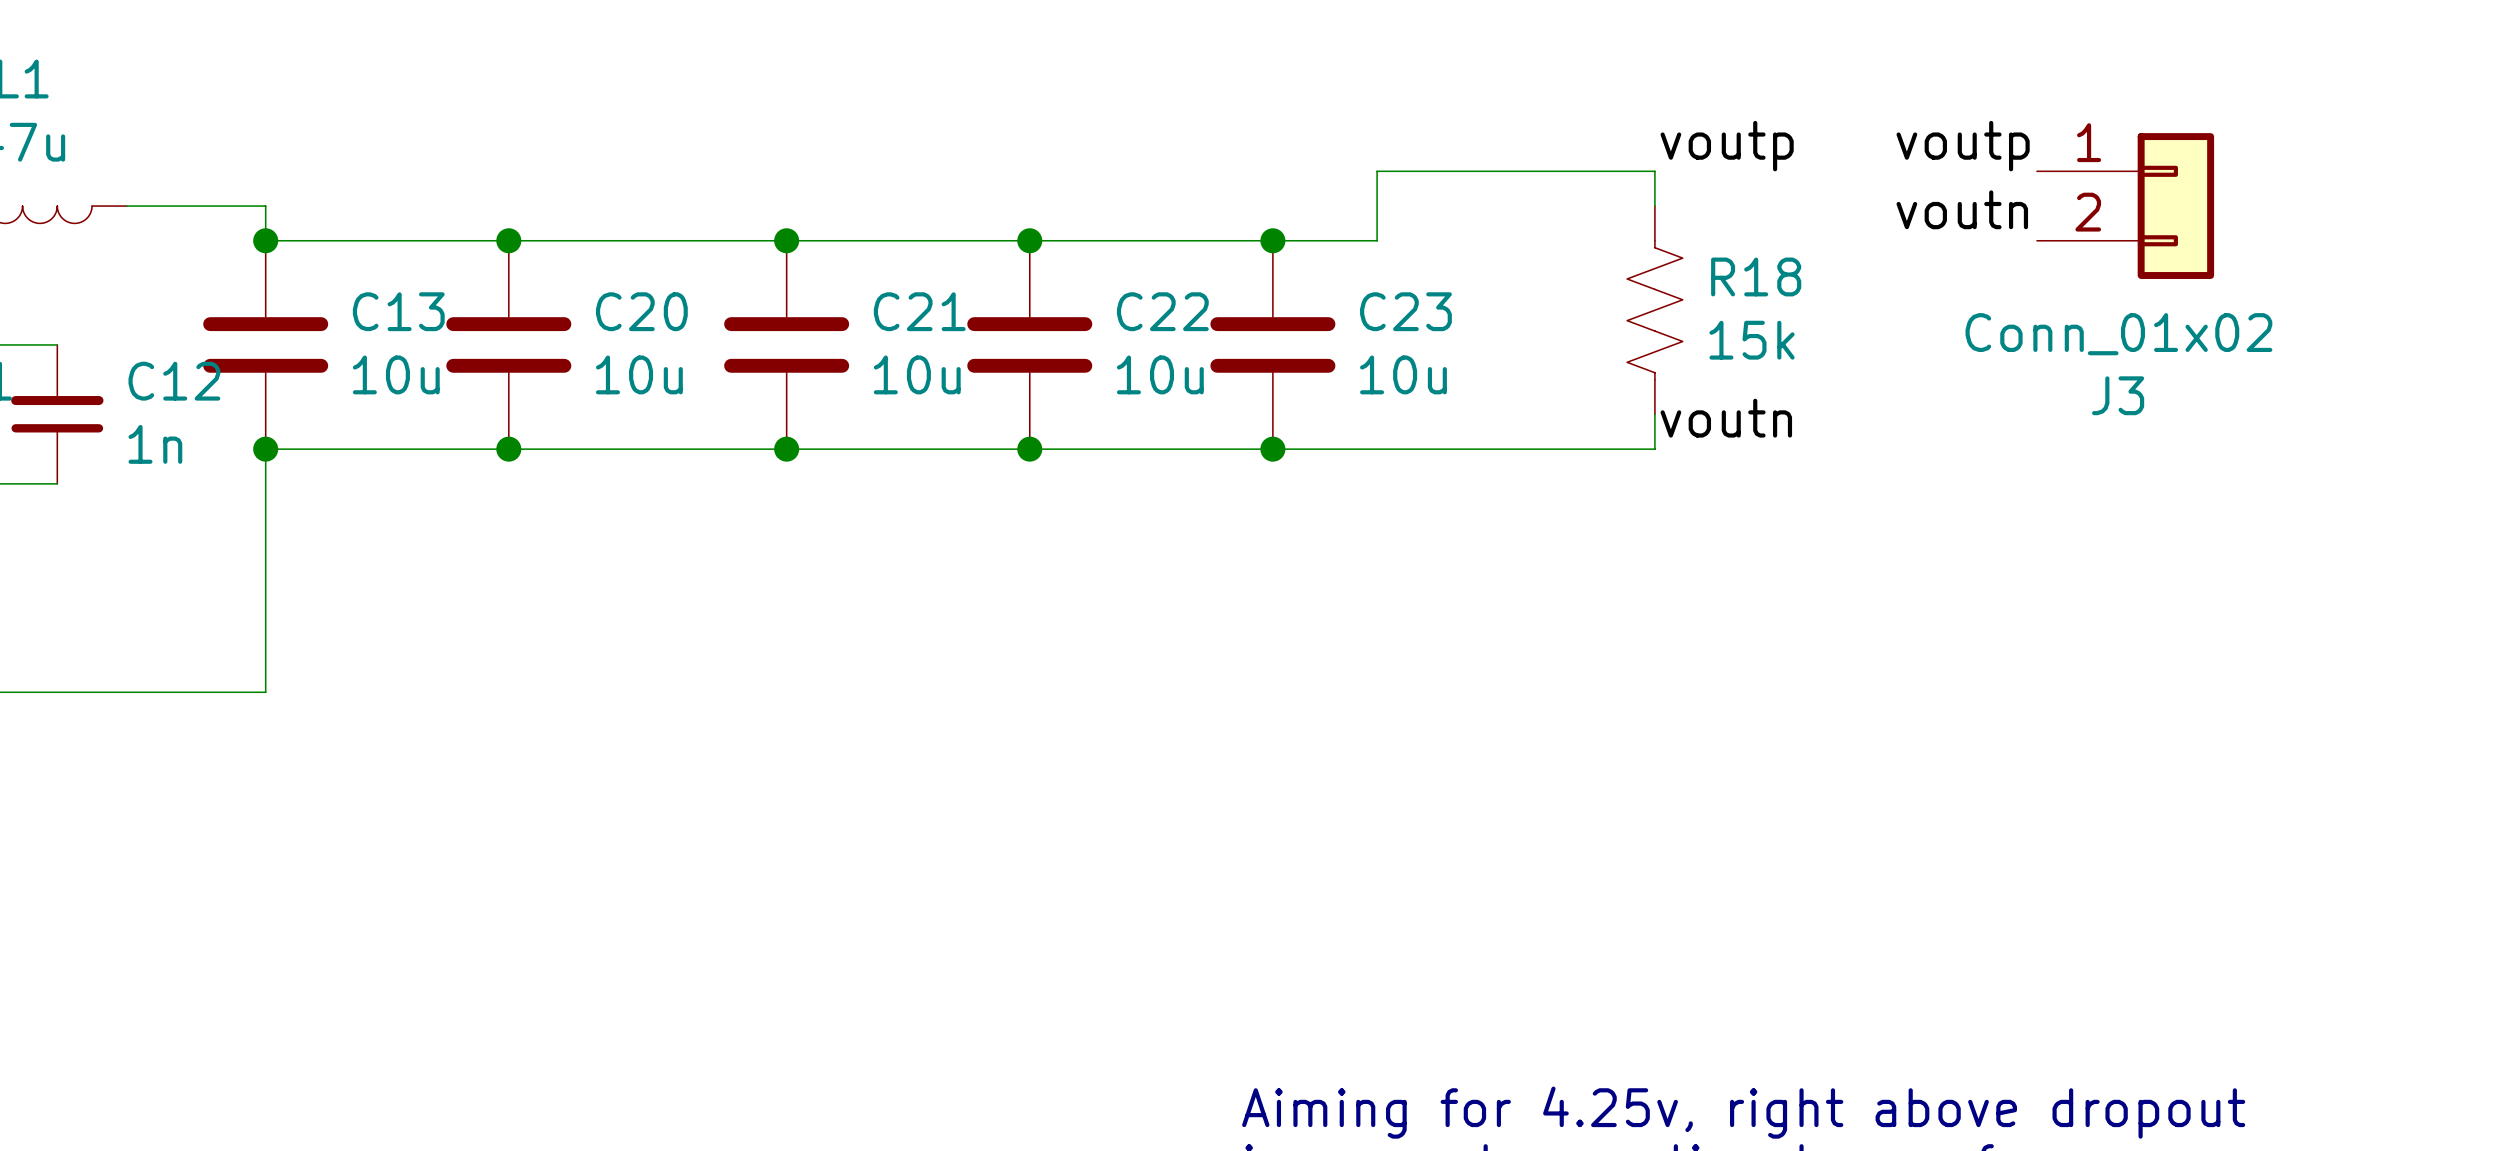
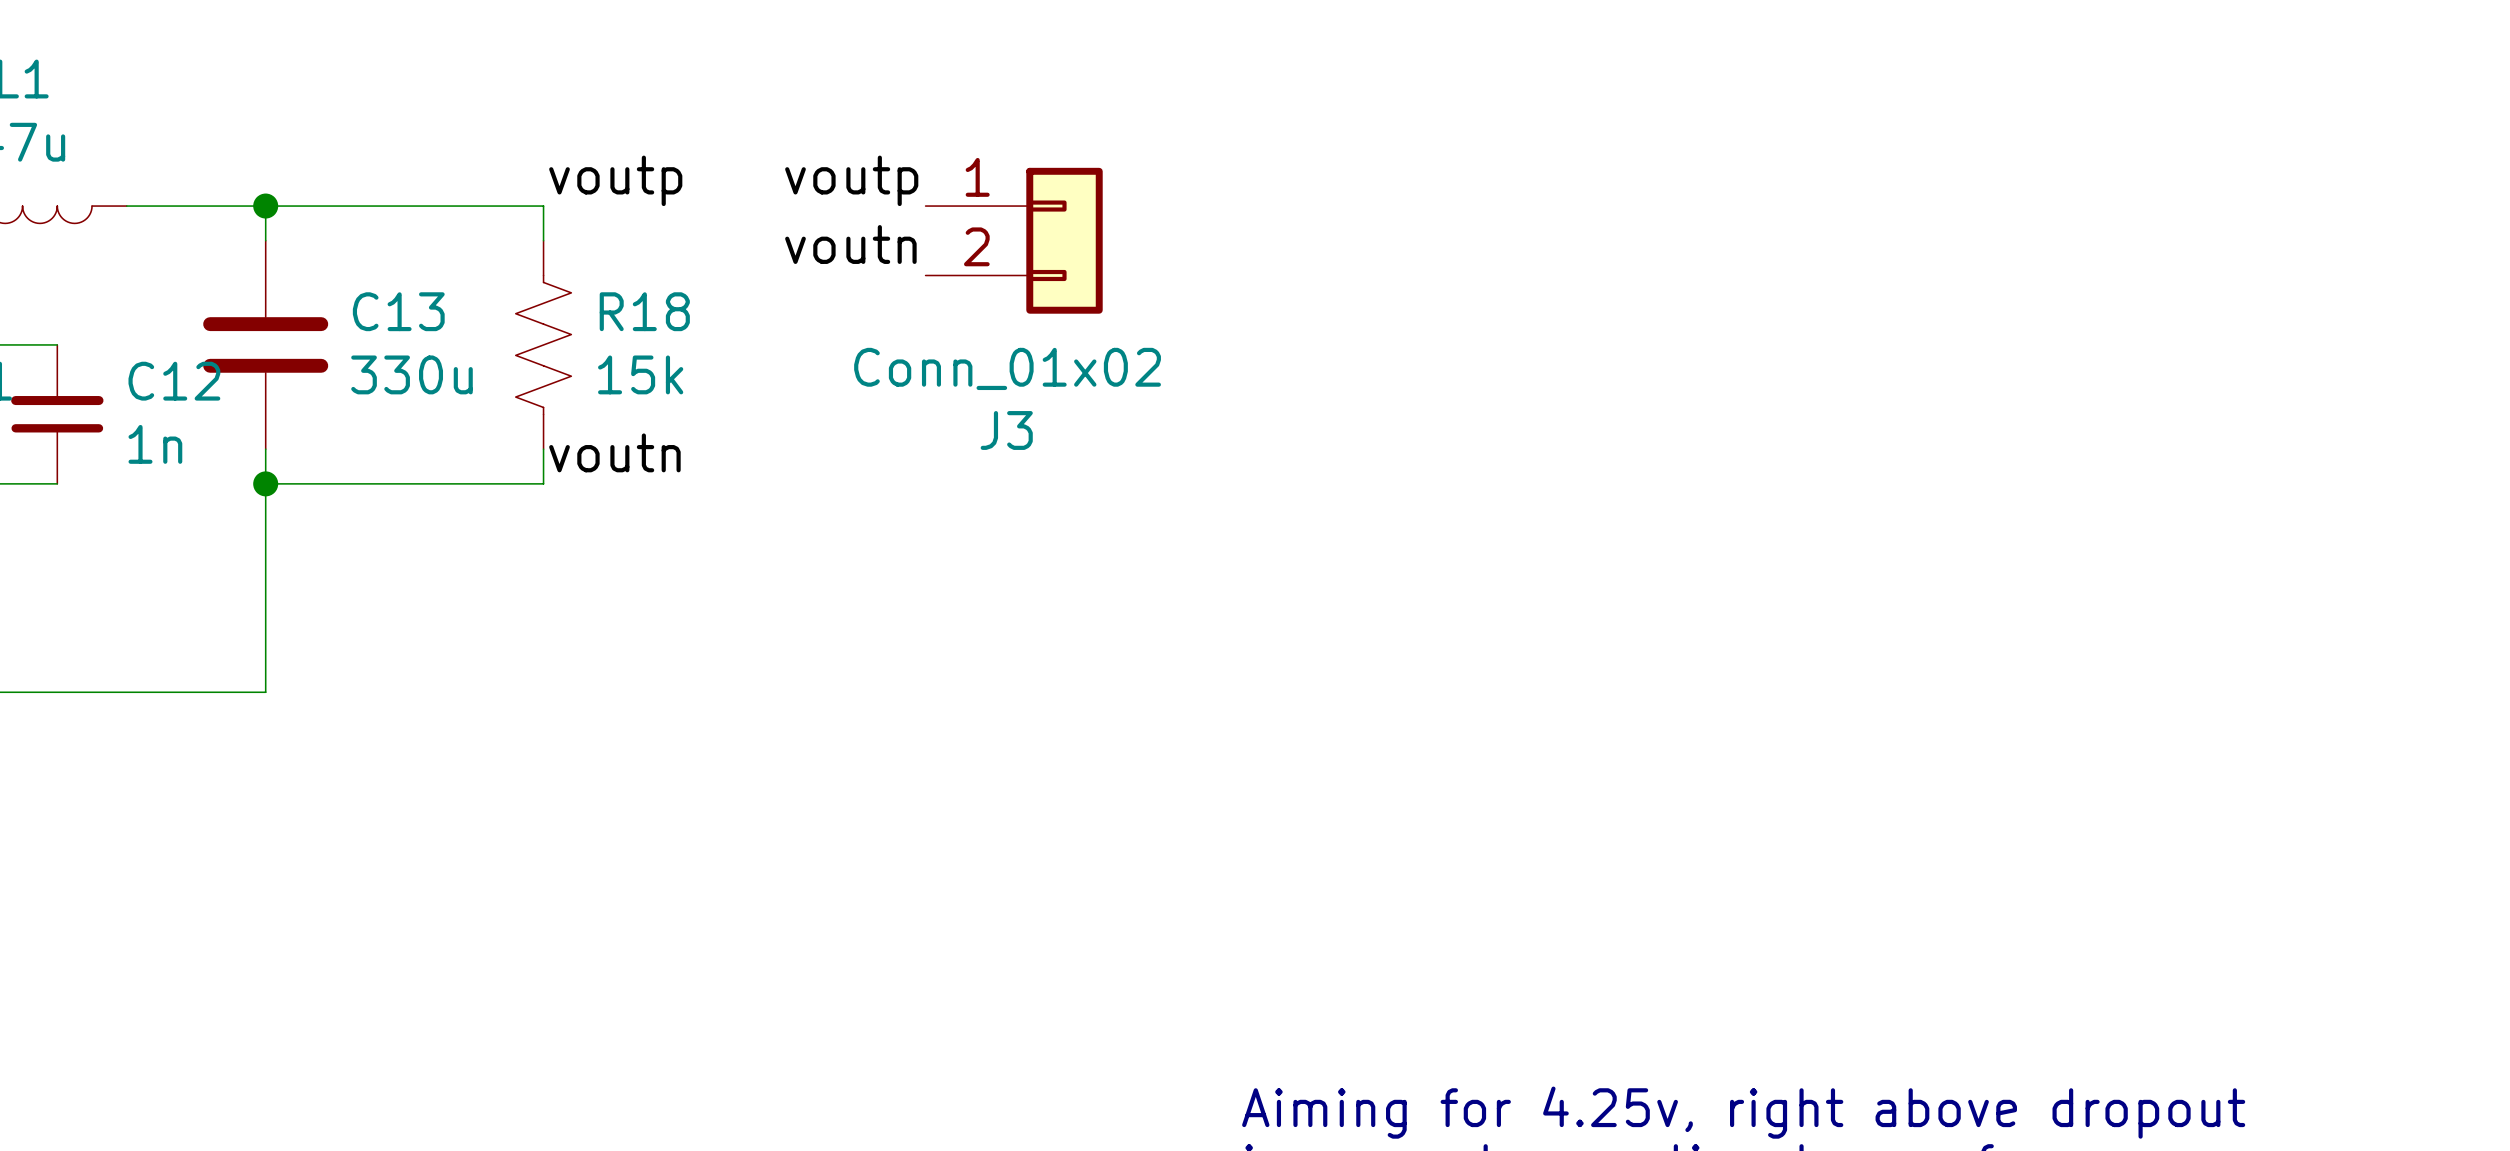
label: voutp (1727, 146) -> none
label: voutp (1963, 146) -> none
label: none -> voutp (615, 180)
label: none -> voutp (851, 180)
wire: none -> (265, 206) (543, 206) (543, 240)
wire: (1654, 206) (1654, 171) (1377, 171) (1377, 240) (265, 240) -> none
J3 position: (2125, 206) -> (1014, 240)
label: voutn (1962, 209) -> none
junction position: (265, 240) -> (265, 206)
junction: (508, 240) -> none
junction: (786, 240) -> none
junction: (1029, 240) -> none
junction: (1272, 240) -> none
label: none -> voutn (850, 244)
R18 position: (1654, 310) -> (543, 344)
C20: 10u (508, 344) -> none
C21: 10u (786, 344) -> none
C22: 10u (1029, 344) -> none
C23: 10u (1272, 344) -> none
C13 value: 10u (396, 374) -> 330u (411, 374)
wire: (1654, 414) (1654, 449) (265, 449) -> none
label: voutn (1726, 418) -> none
junction position: (265, 449) -> (265, 483)
junction: (508, 449) -> none
wire: none -> (543, 449) (543, 483) (265, 483)
junction: (786, 449) -> none
junction: (1029, 449) -> none
junction: (1272, 449) -> none
label: none -> voutn (614, 452)

